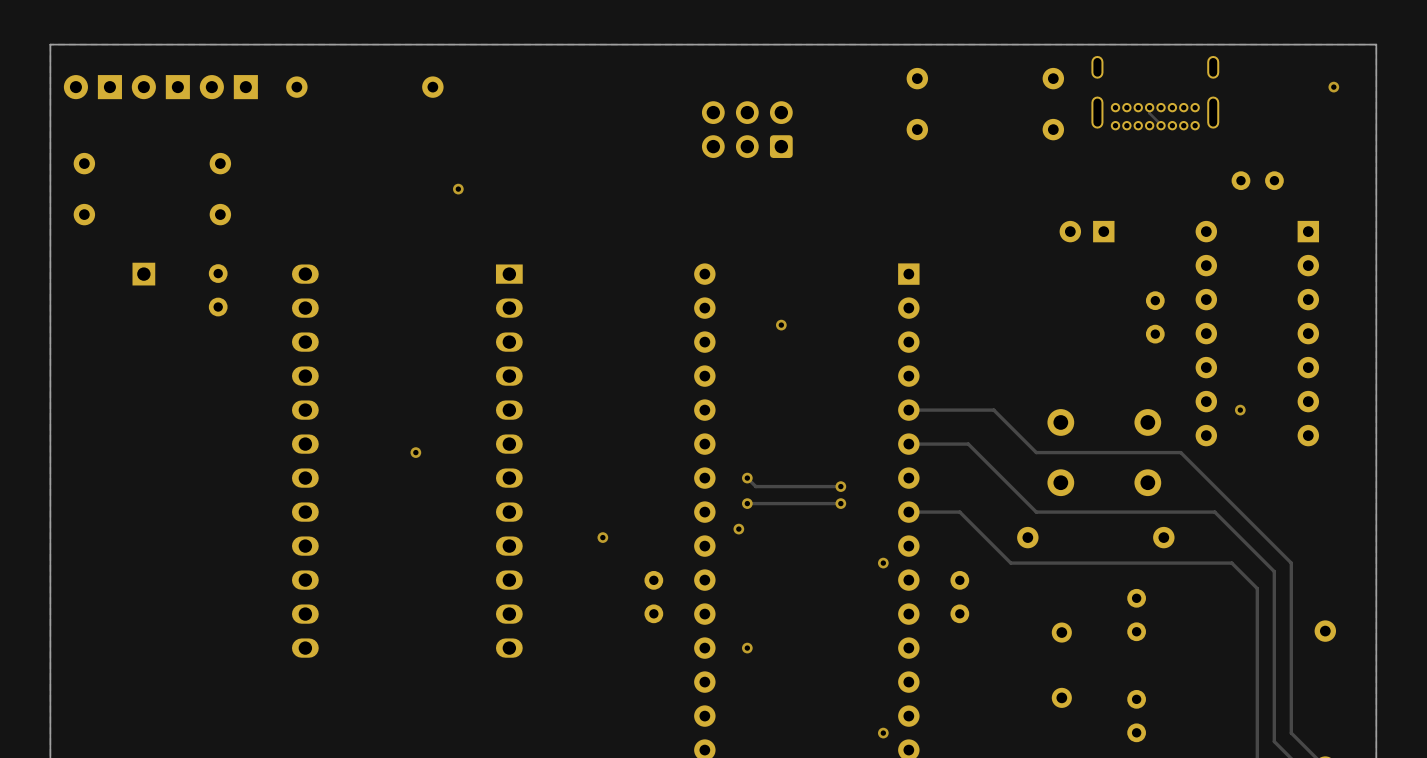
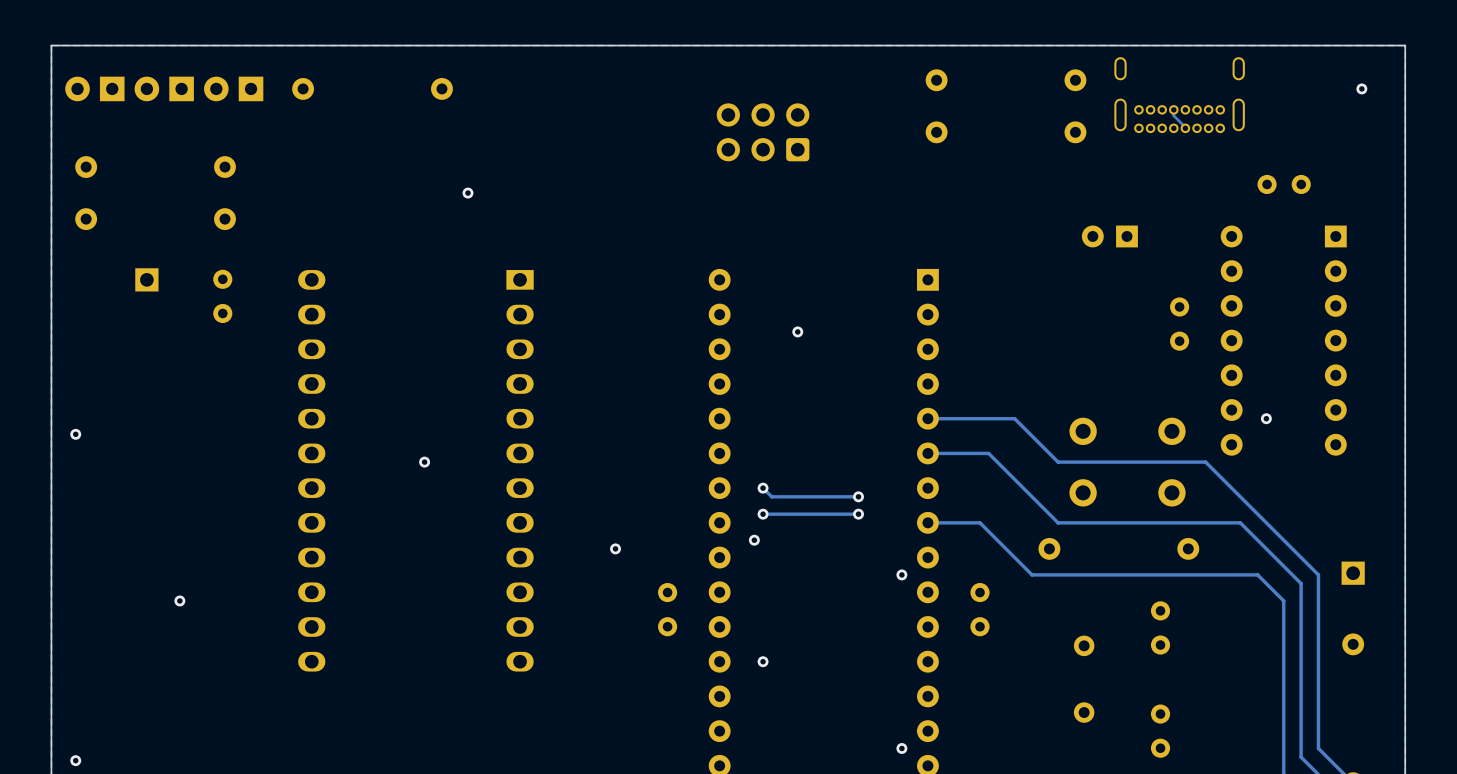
via: none -> (75, 434)
part: none -> (1353, 573)
via: none -> (179, 600)
via: none -> (75, 760)

